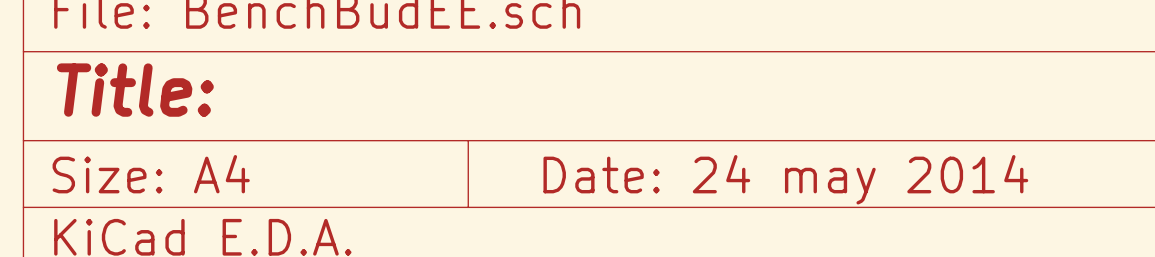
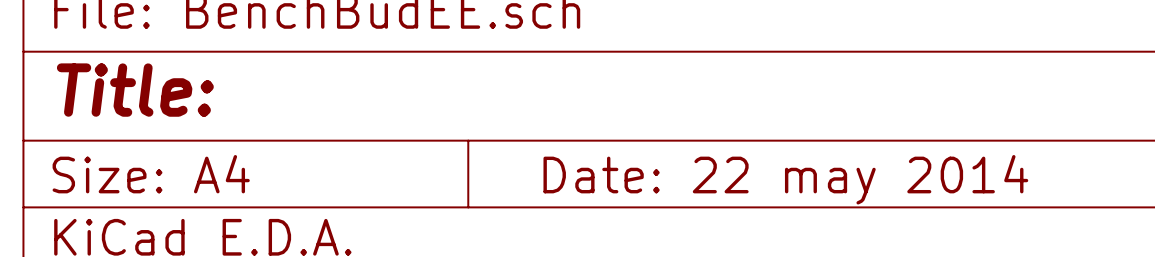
title block: Date: 24 may 2014 (785, 179) -> Date: 22 may 2014 (785, 179)

